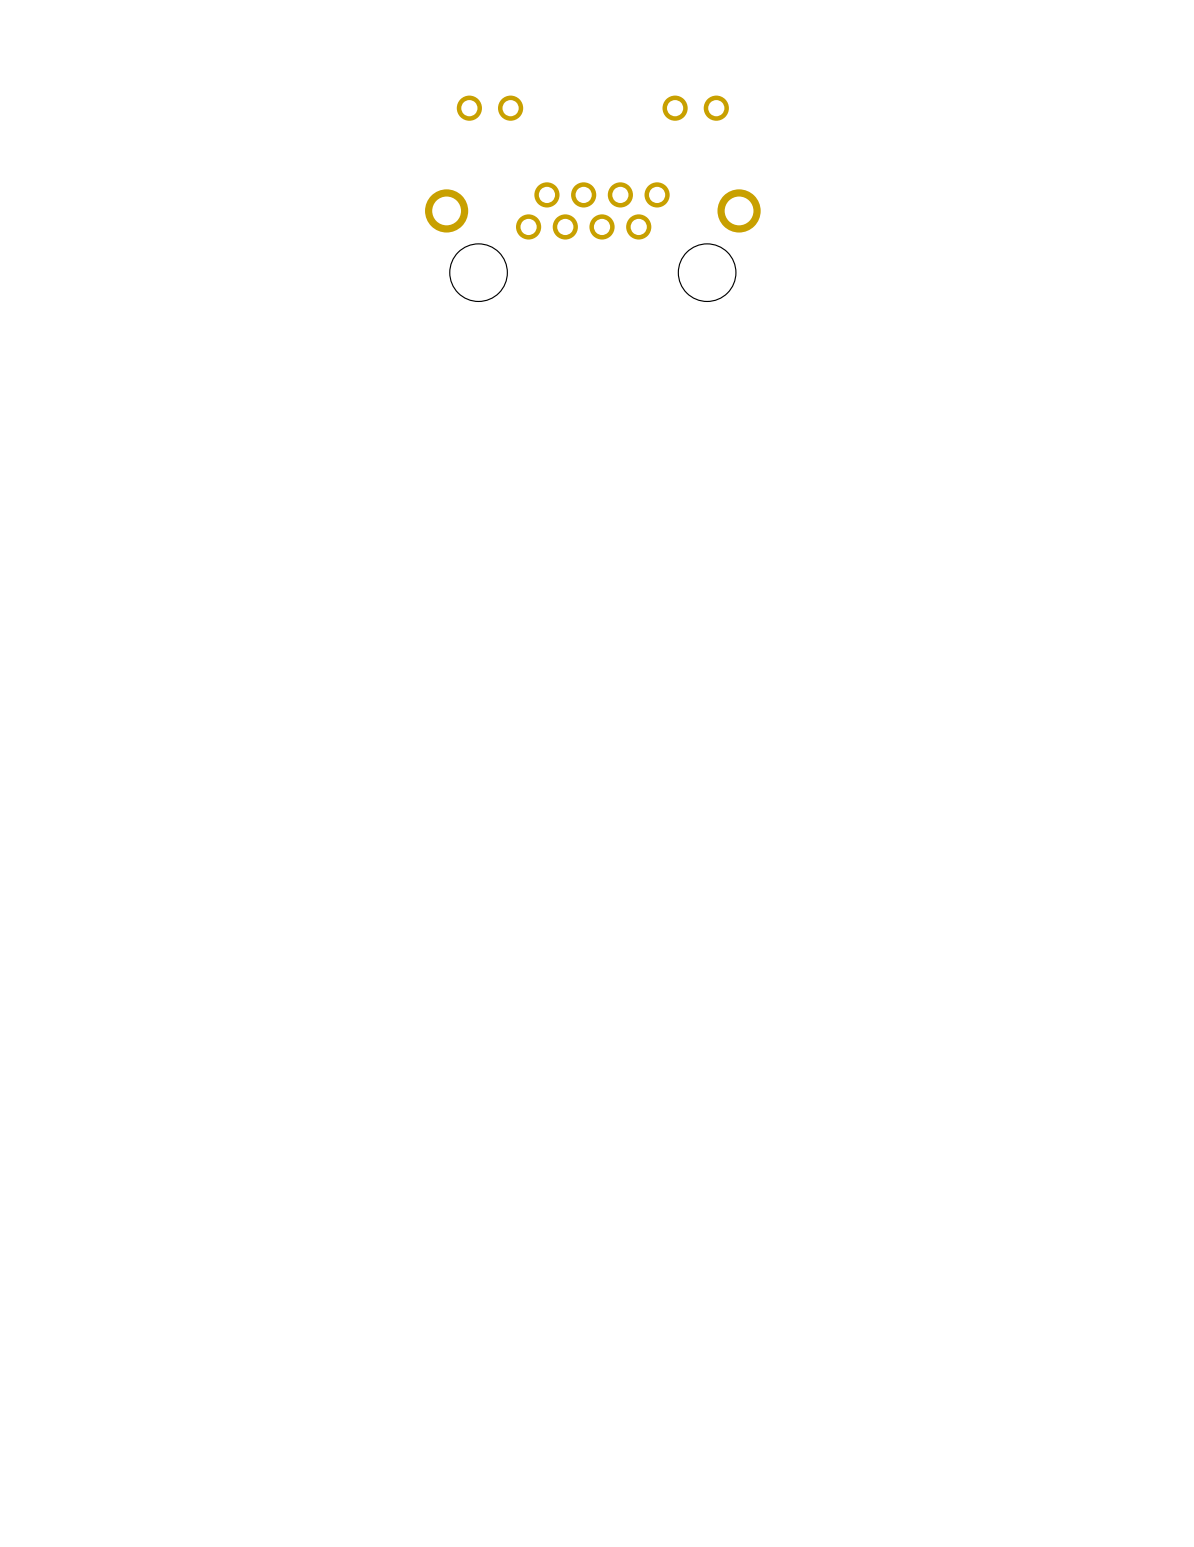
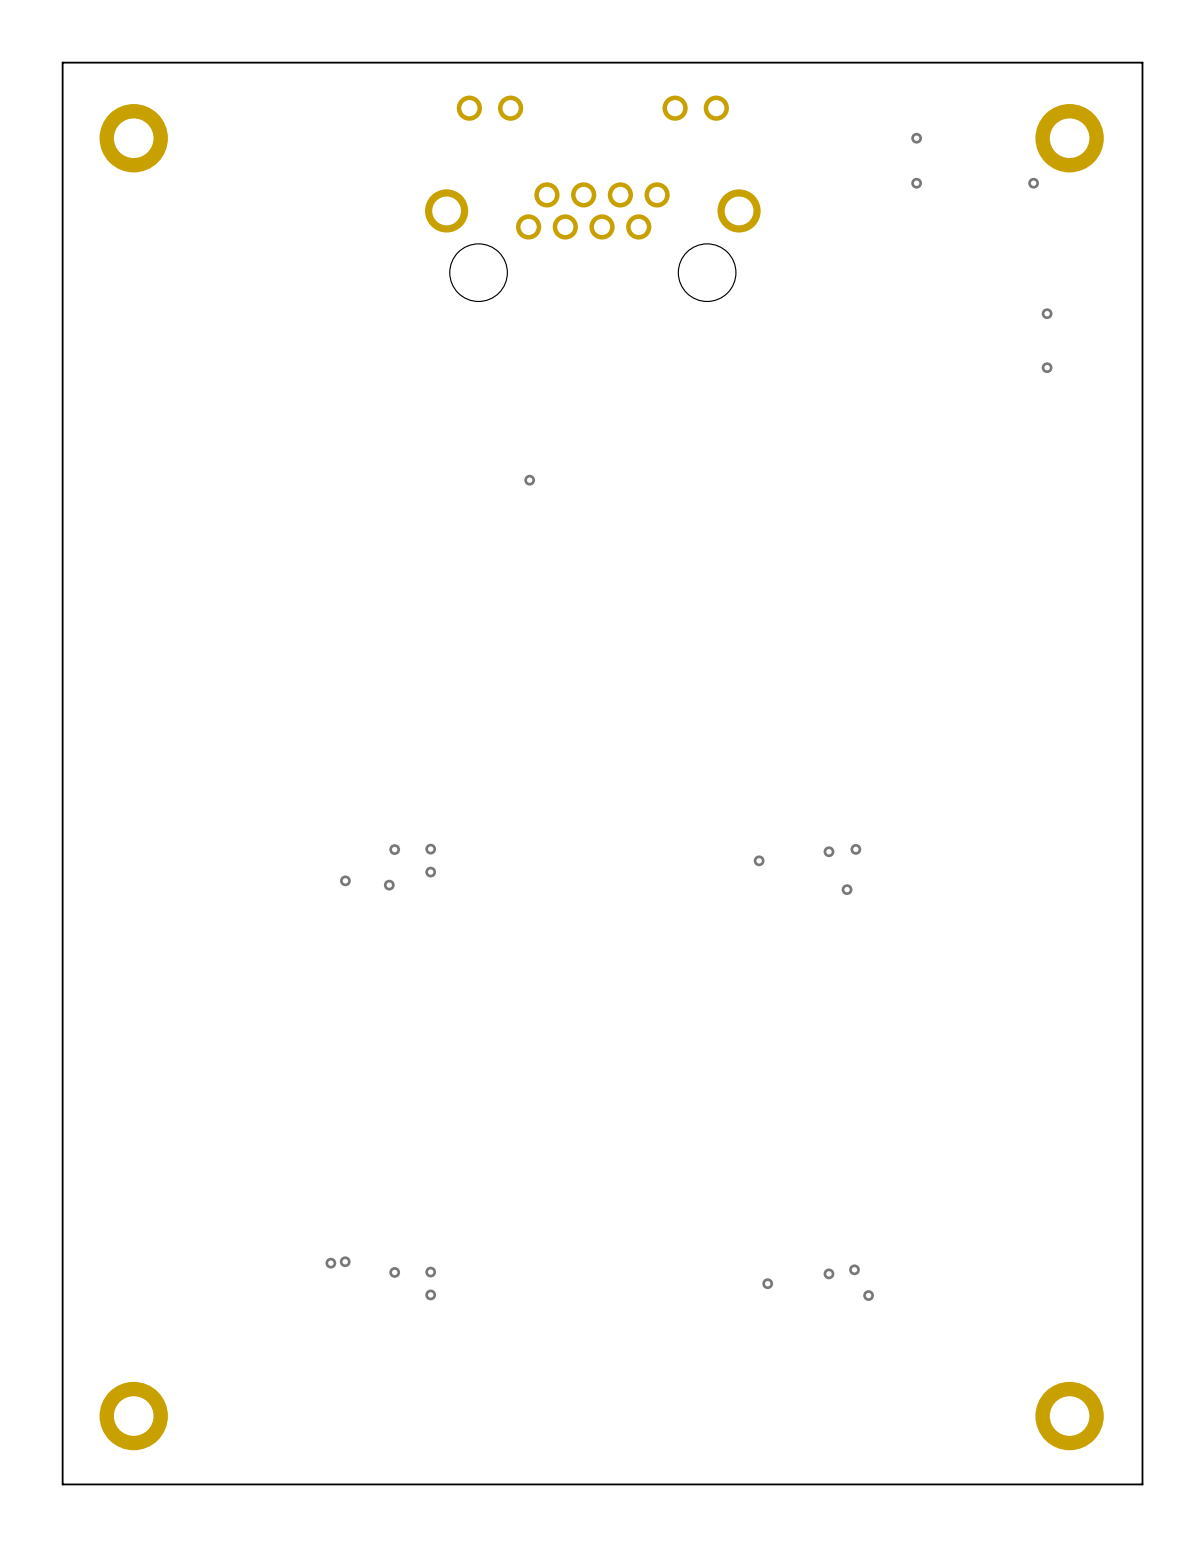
board edge: none -> (1142, 62) (62, 62) (62, 1484) (1142, 1484) (1142, 62)
part: none -> (133, 138)
via: none -> (916, 138)
part: none -> (1069, 138)
via: none -> (916, 183)
via: none -> (1033, 183)
via: none -> (1047, 313)
via: none -> (1047, 367)
via: none -> (529, 480)
via: none -> (394, 849)
via: none -> (430, 849)
via: none -> (855, 849)
via: none -> (828, 851)
via: none -> (759, 860)
via: none -> (430, 872)
via: none -> (345, 880)
via: none -> (389, 885)
via: none -> (847, 889)
via: none -> (345, 1261)
via: none -> (330, 1263)
via: none -> (854, 1269)
via: none -> (394, 1272)
via: none -> (430, 1272)
via: none -> (828, 1273)
via: none -> (767, 1283)
via: none -> (430, 1294)
via: none -> (868, 1295)
part: none -> (133, 1416)
part: none -> (1069, 1416)

